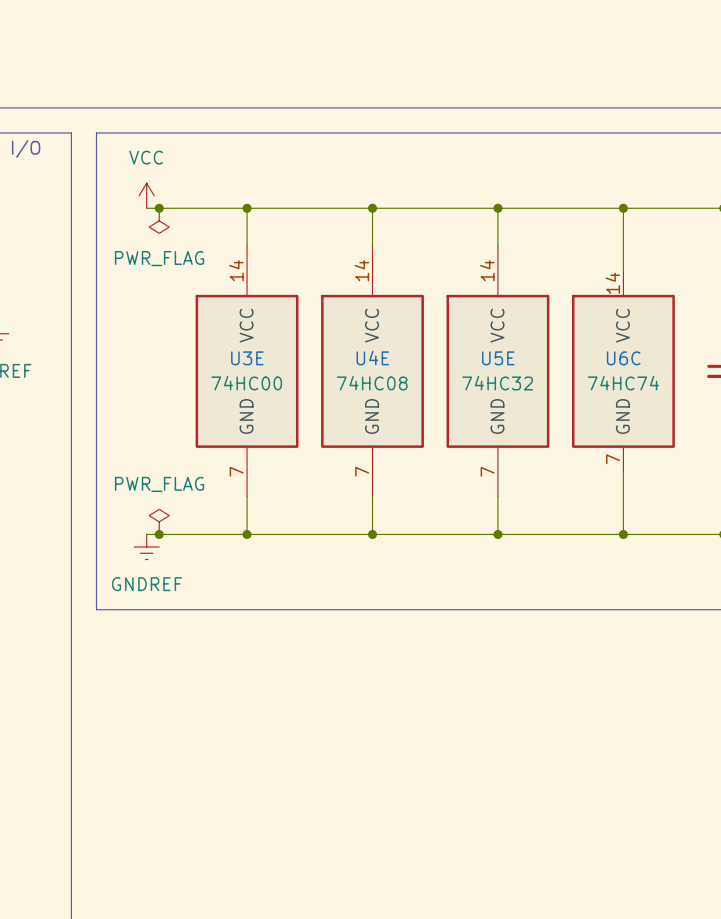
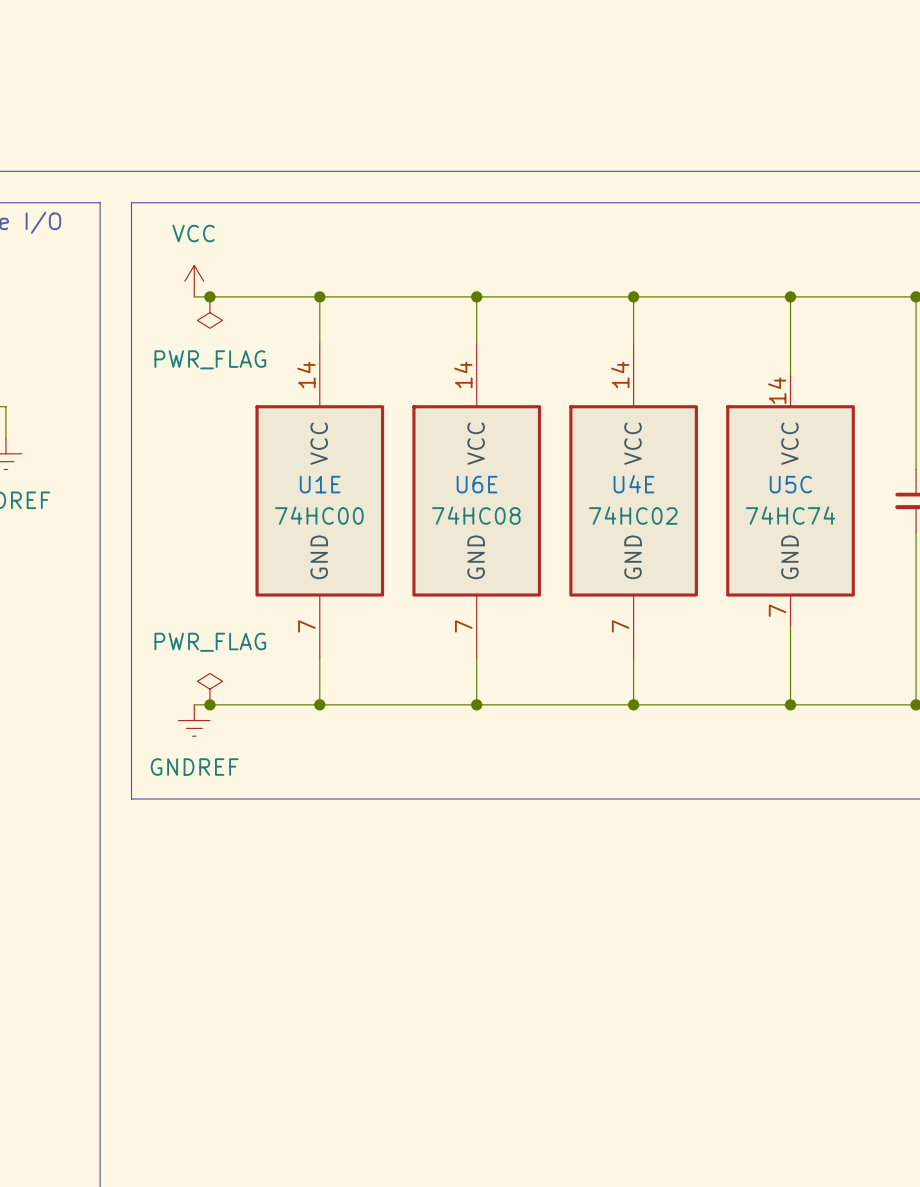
U3E name: U3E (247, 358) -> U1E (320, 484)
U4E name: U4E (372, 358) -> U6E (477, 484)
U5E name: U5E (498, 358) -> U4E (633, 484)
U6C name: U6C (623, 358) -> U5C (790, 484)
U5E value: 74HC32 (497, 383) -> 74HC02 (633, 515)

